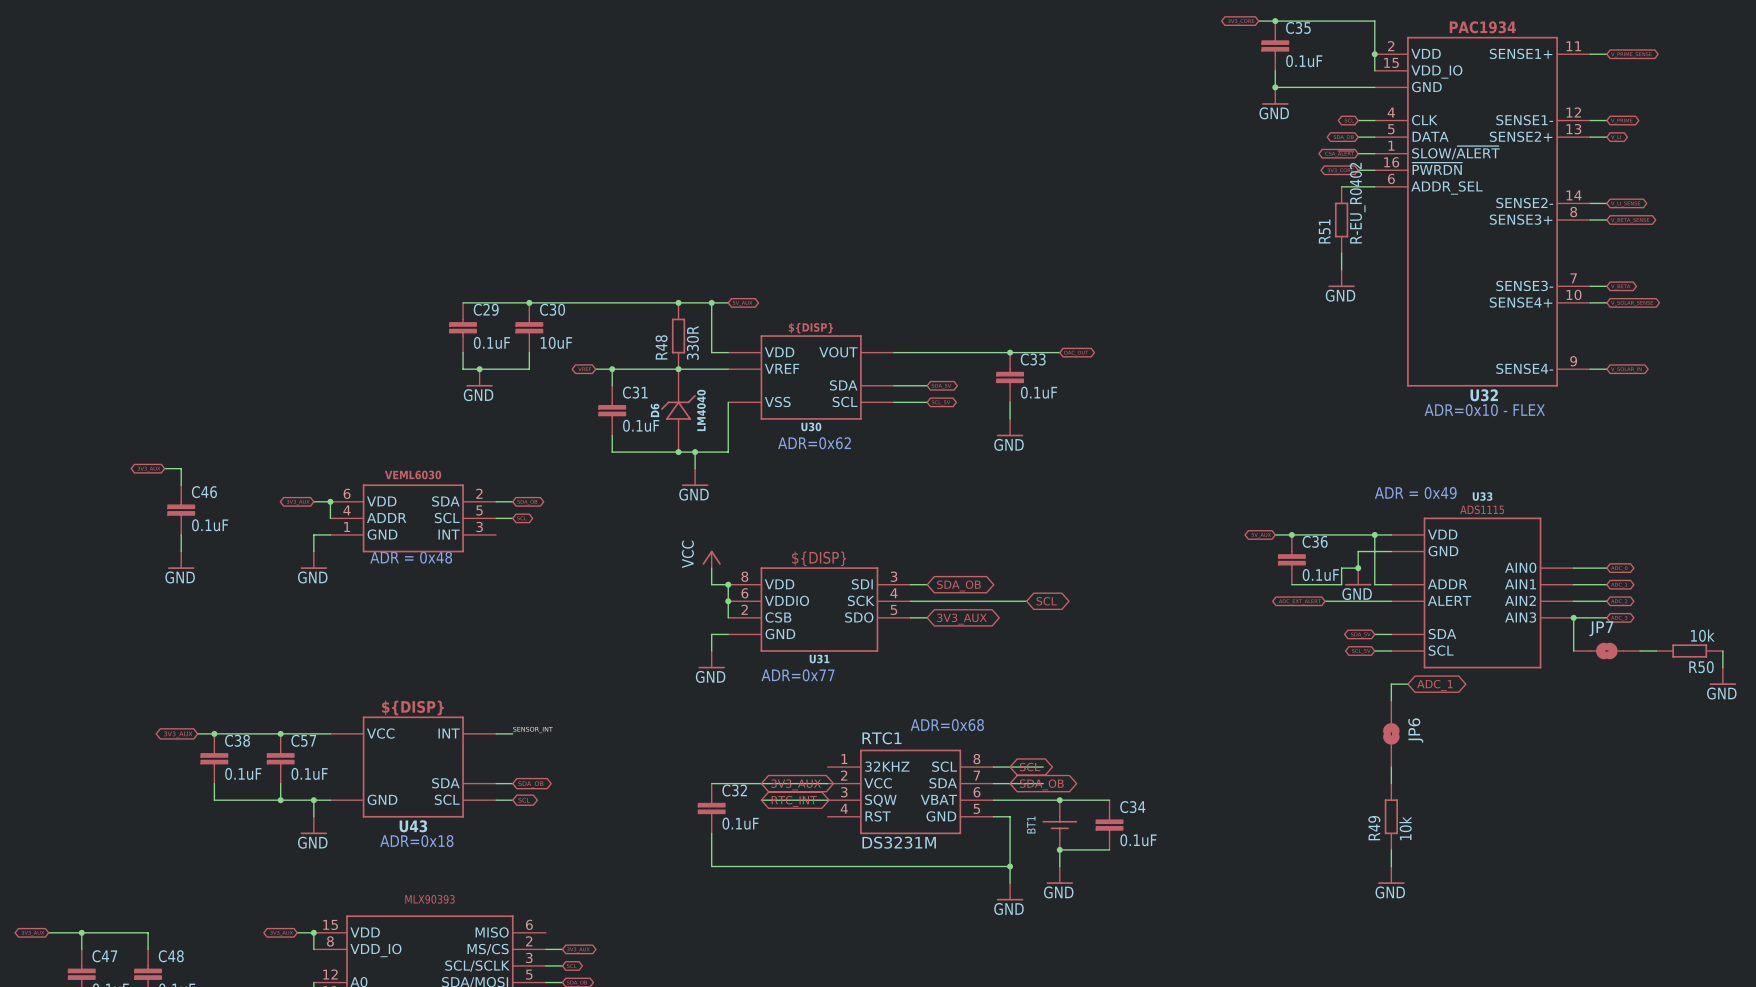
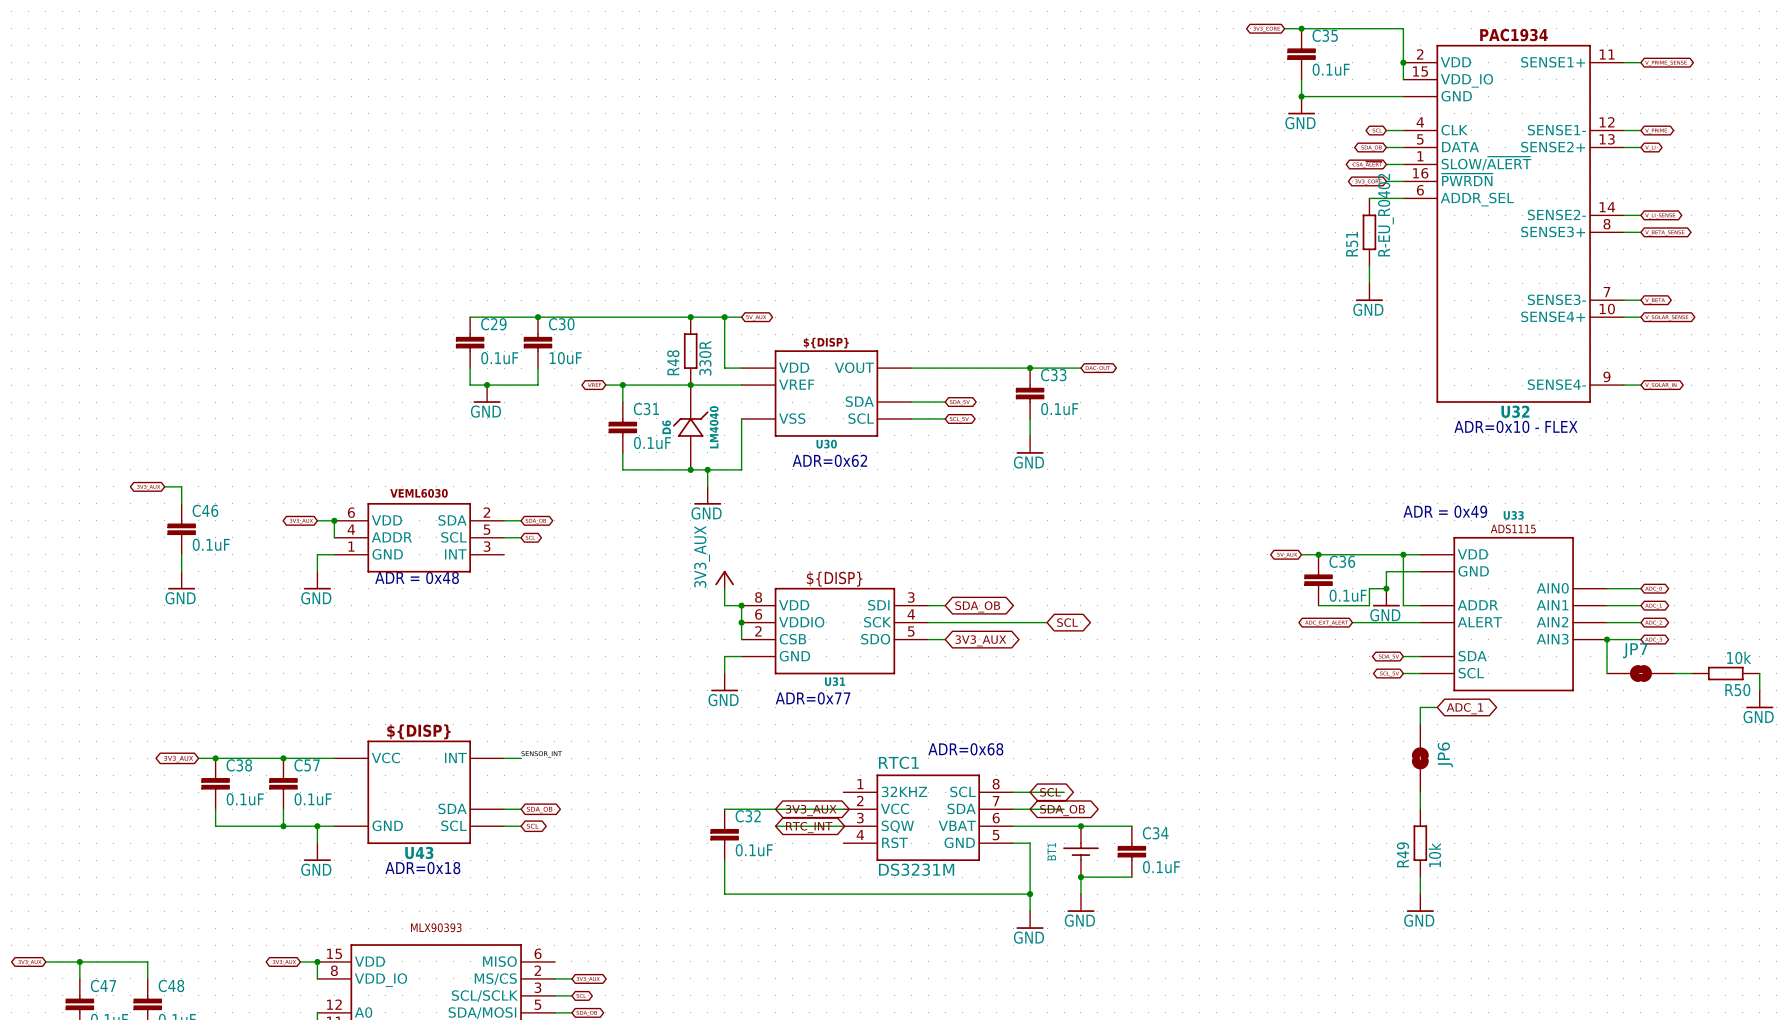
power symbol: VCC (711, 559) -> 3V3_AUX (724, 579)

